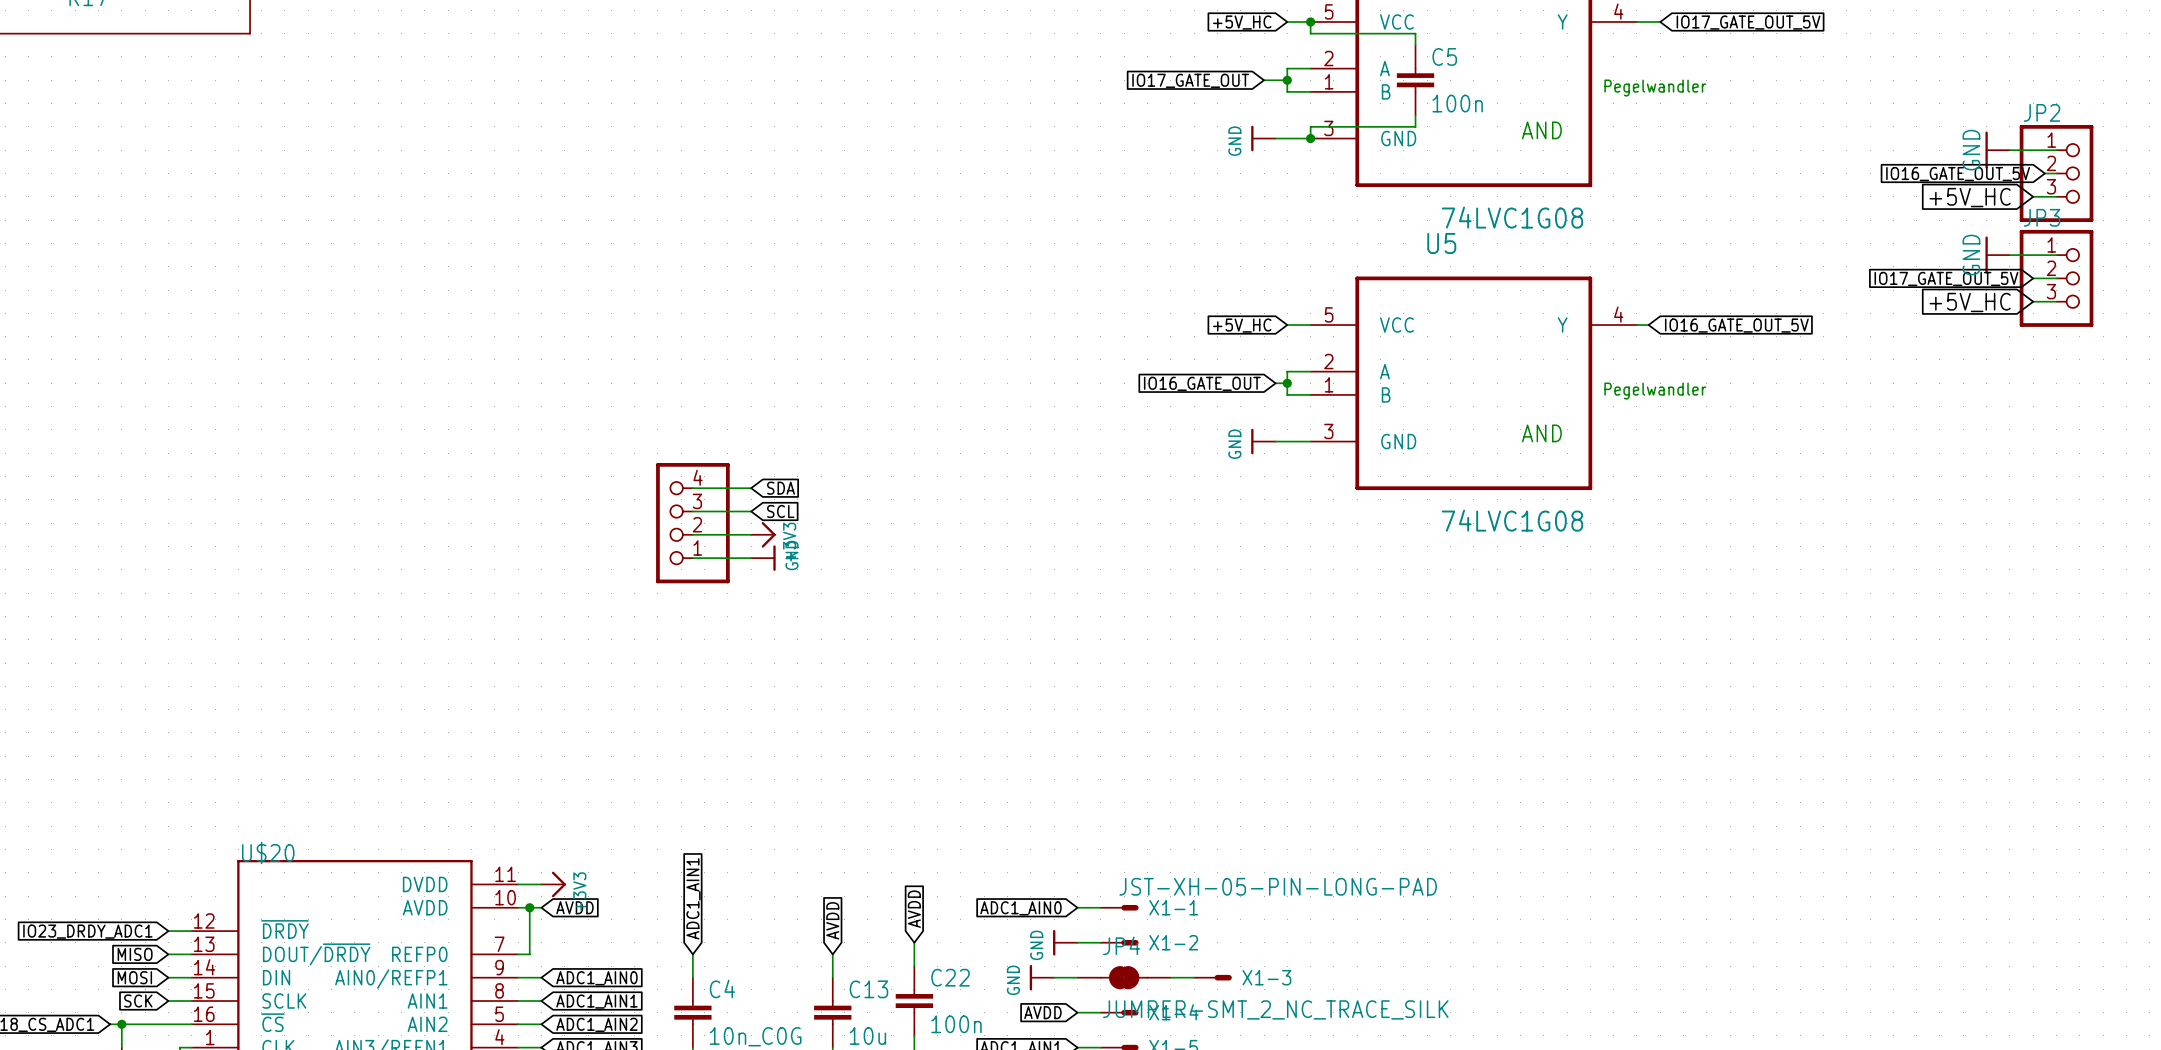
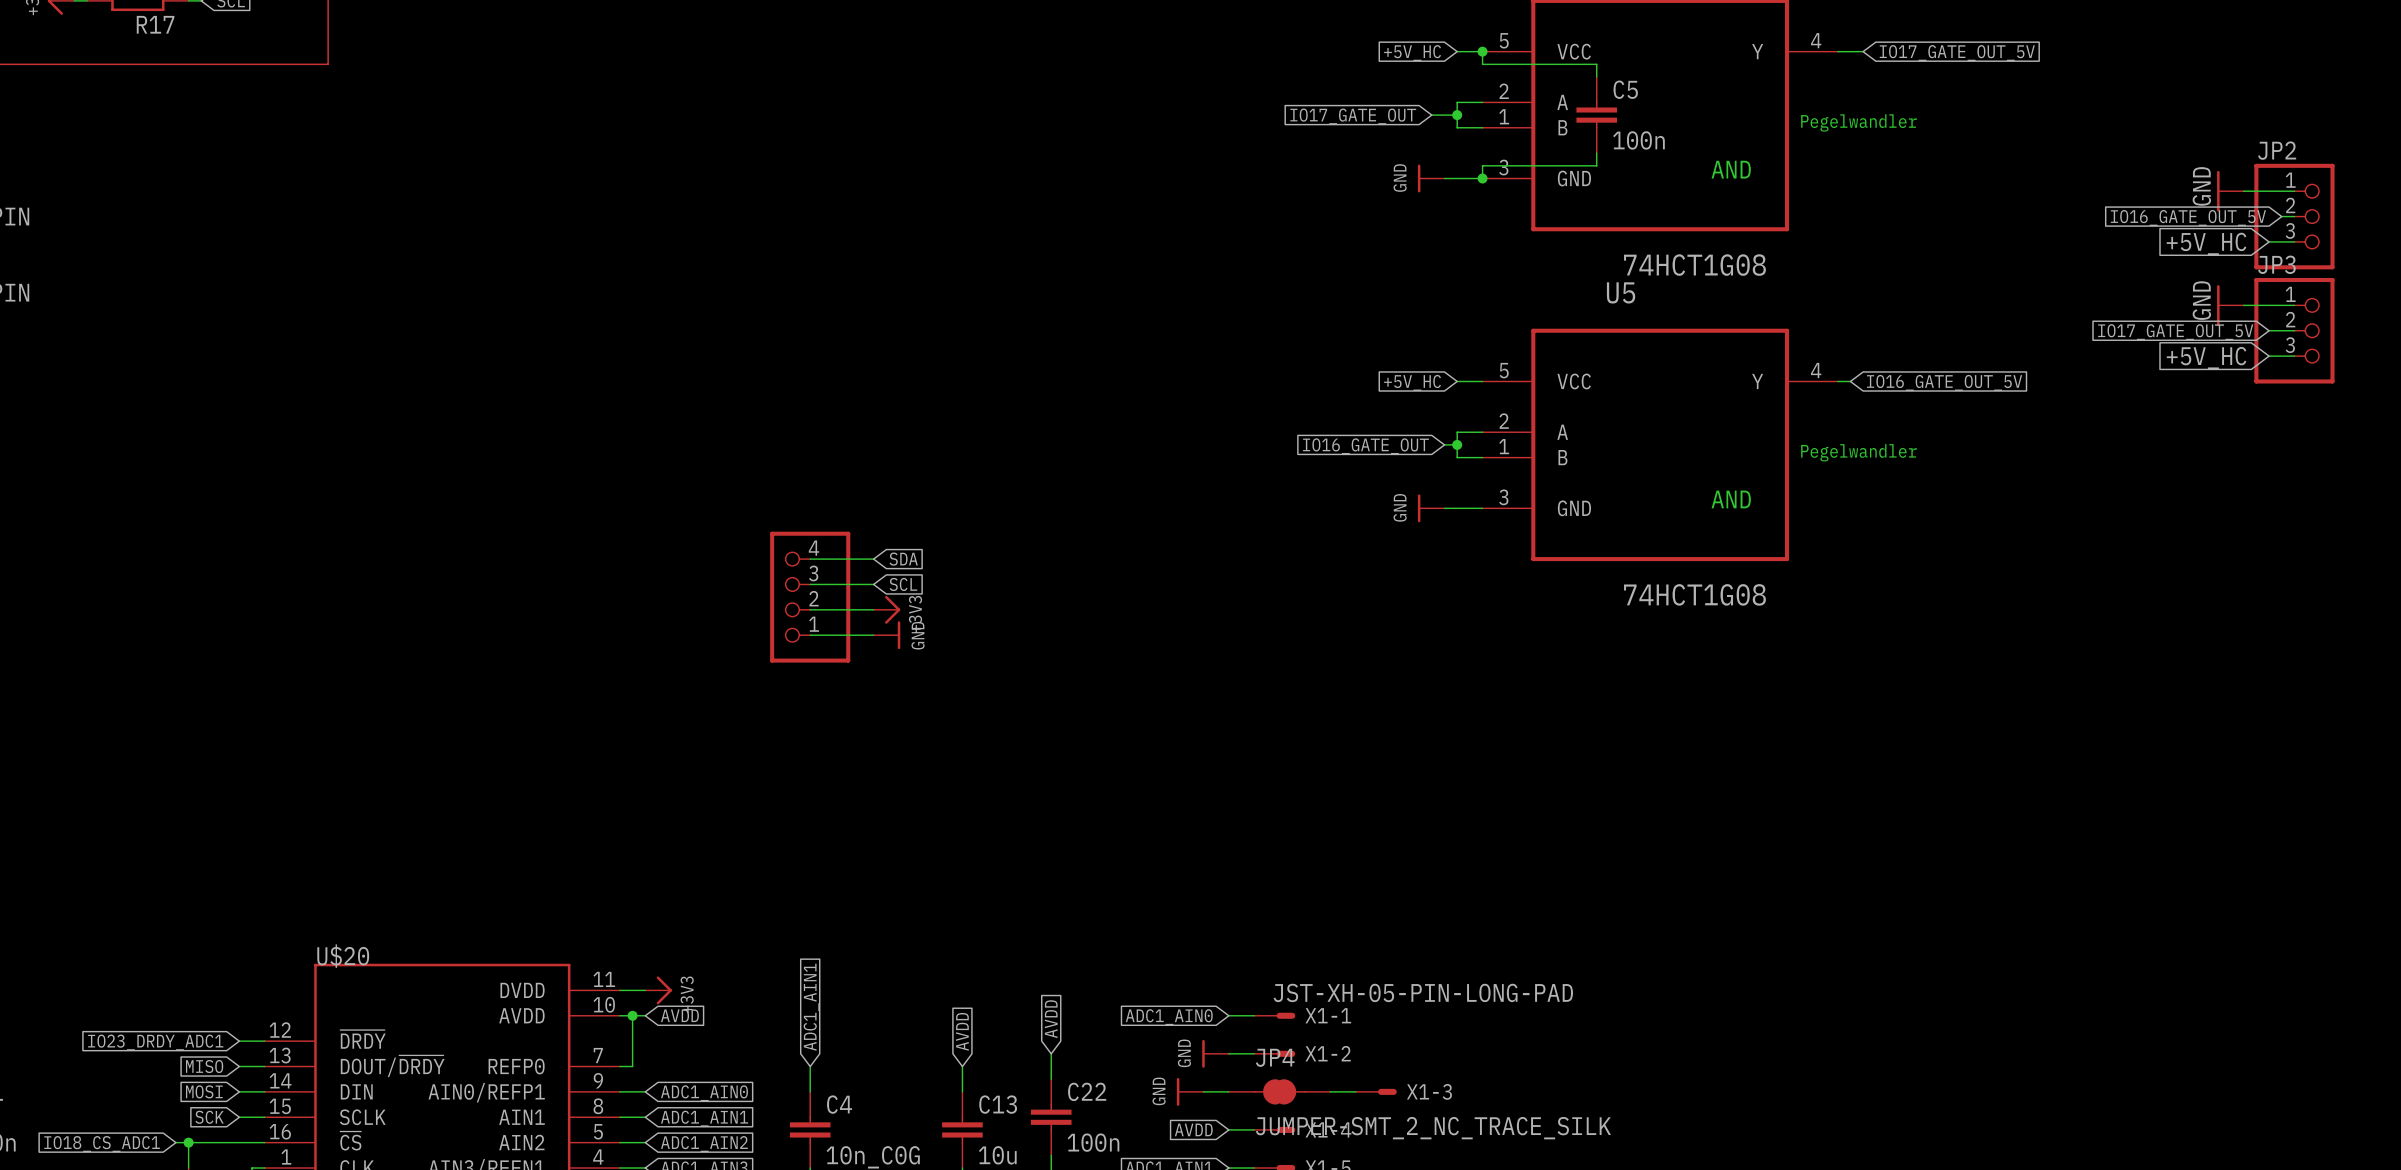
part value: 74LVC1G08 (1512, 217) -> 74HCT1G08 (1694, 265)
U5 value: 74LVC1G08 (1512, 520) -> 74HCT1G08 (1694, 594)

